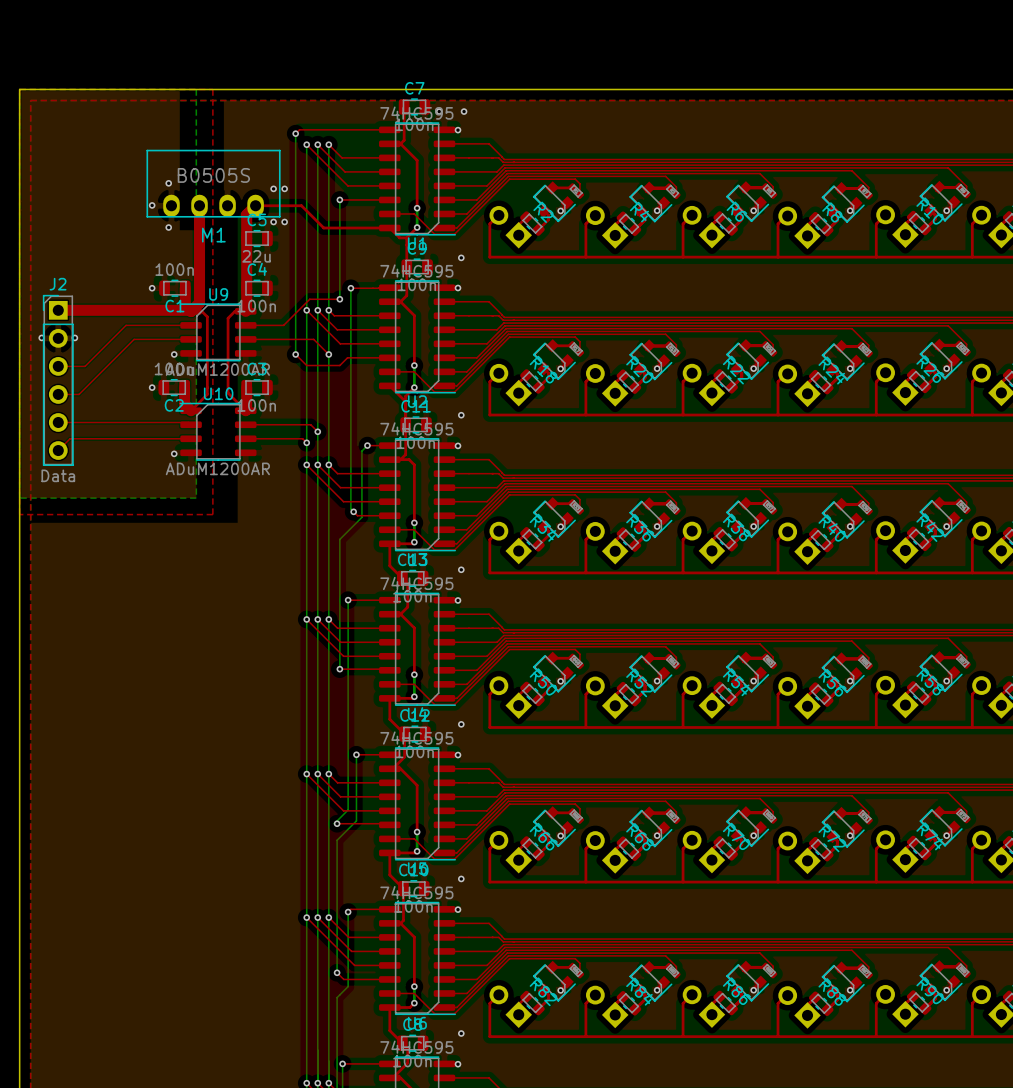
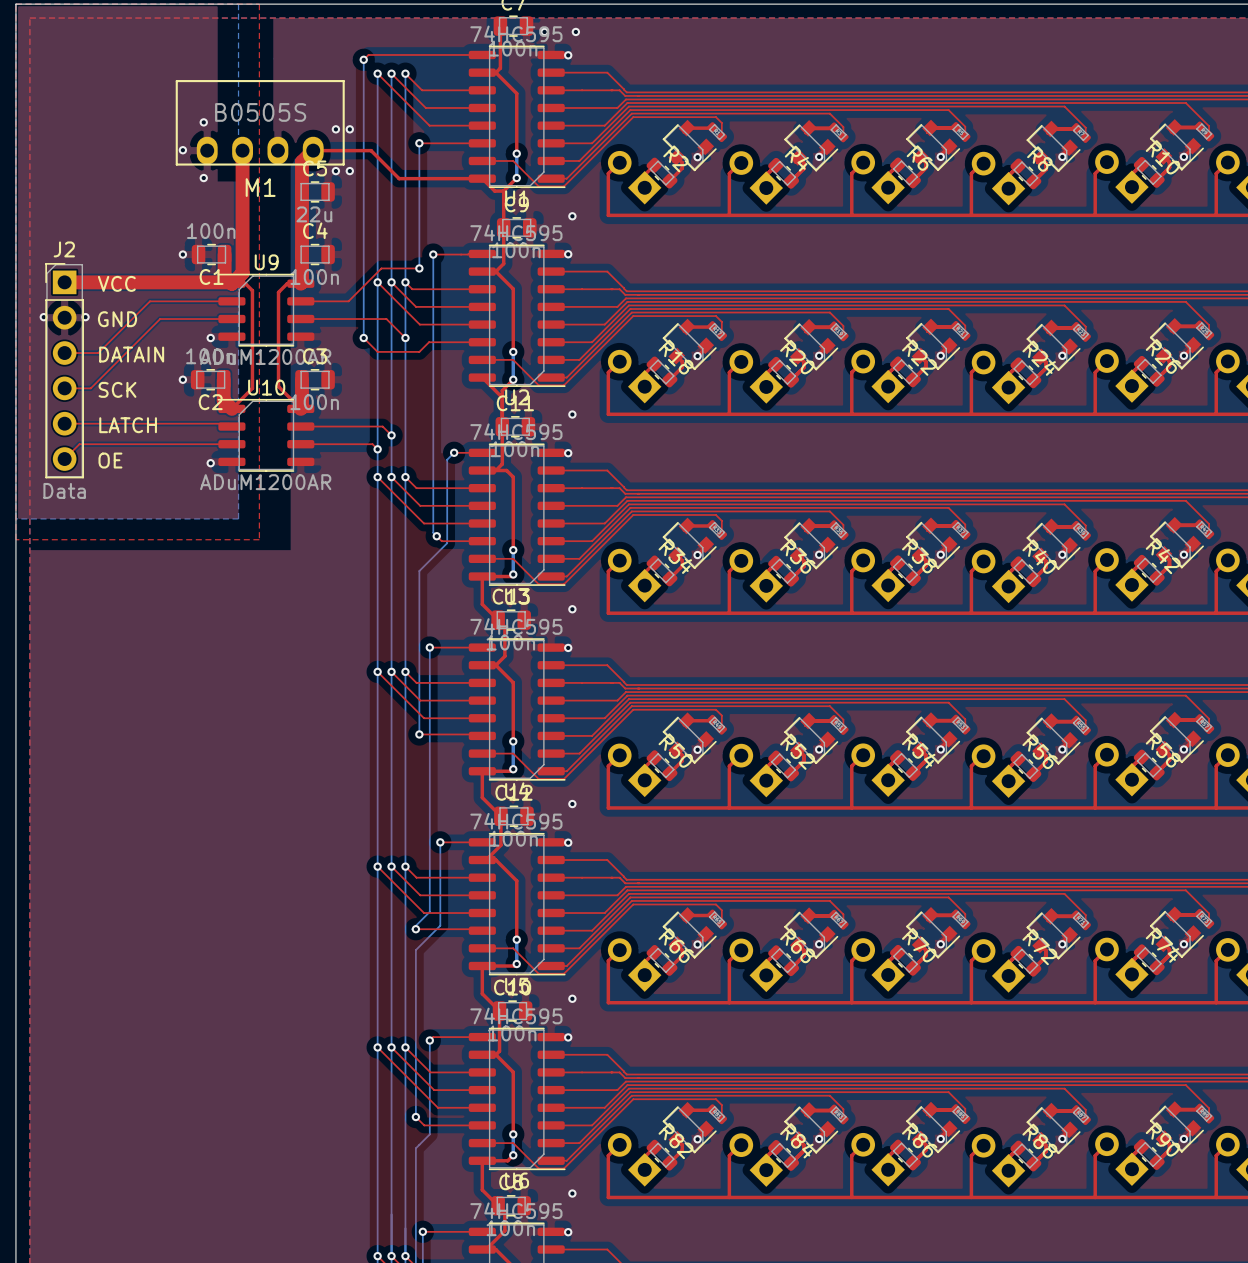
text: none -> VCC (116, 283)
text: none -> GND (117, 319)
text: none -> DATAIN (131, 354)
text: none -> SCK (117, 389)
text: none -> LATCH (128, 425)
text: none -> OE (110, 460)

